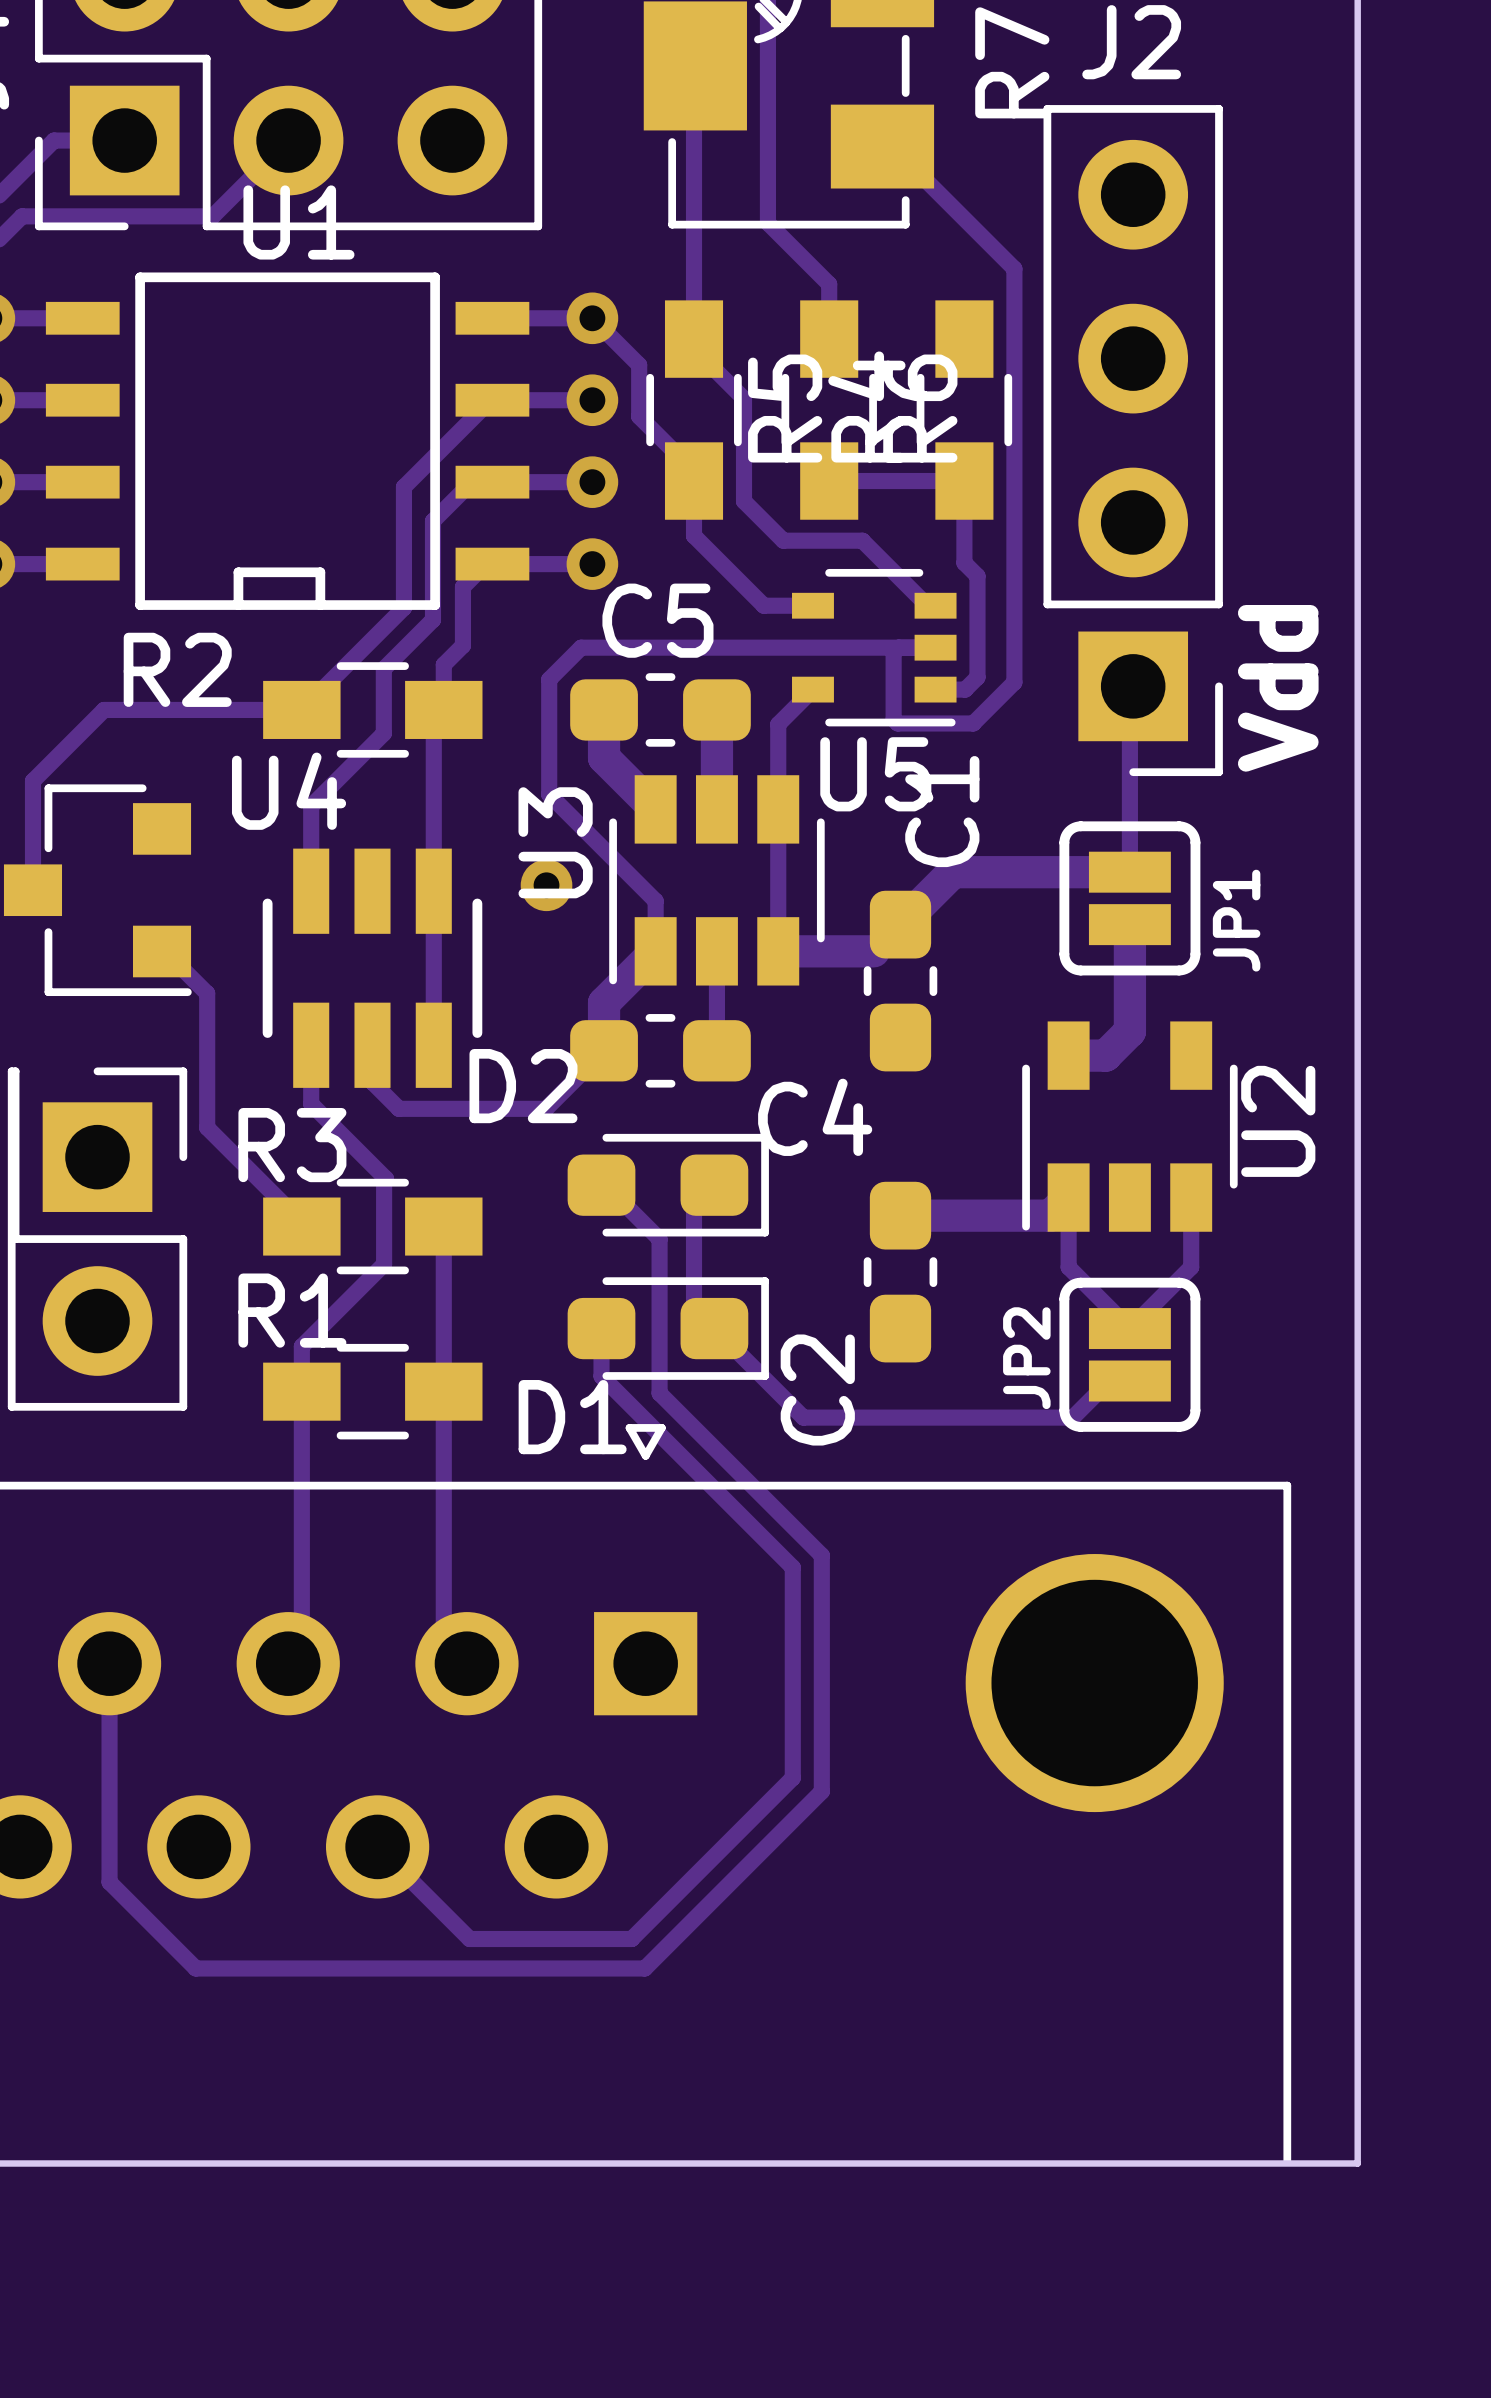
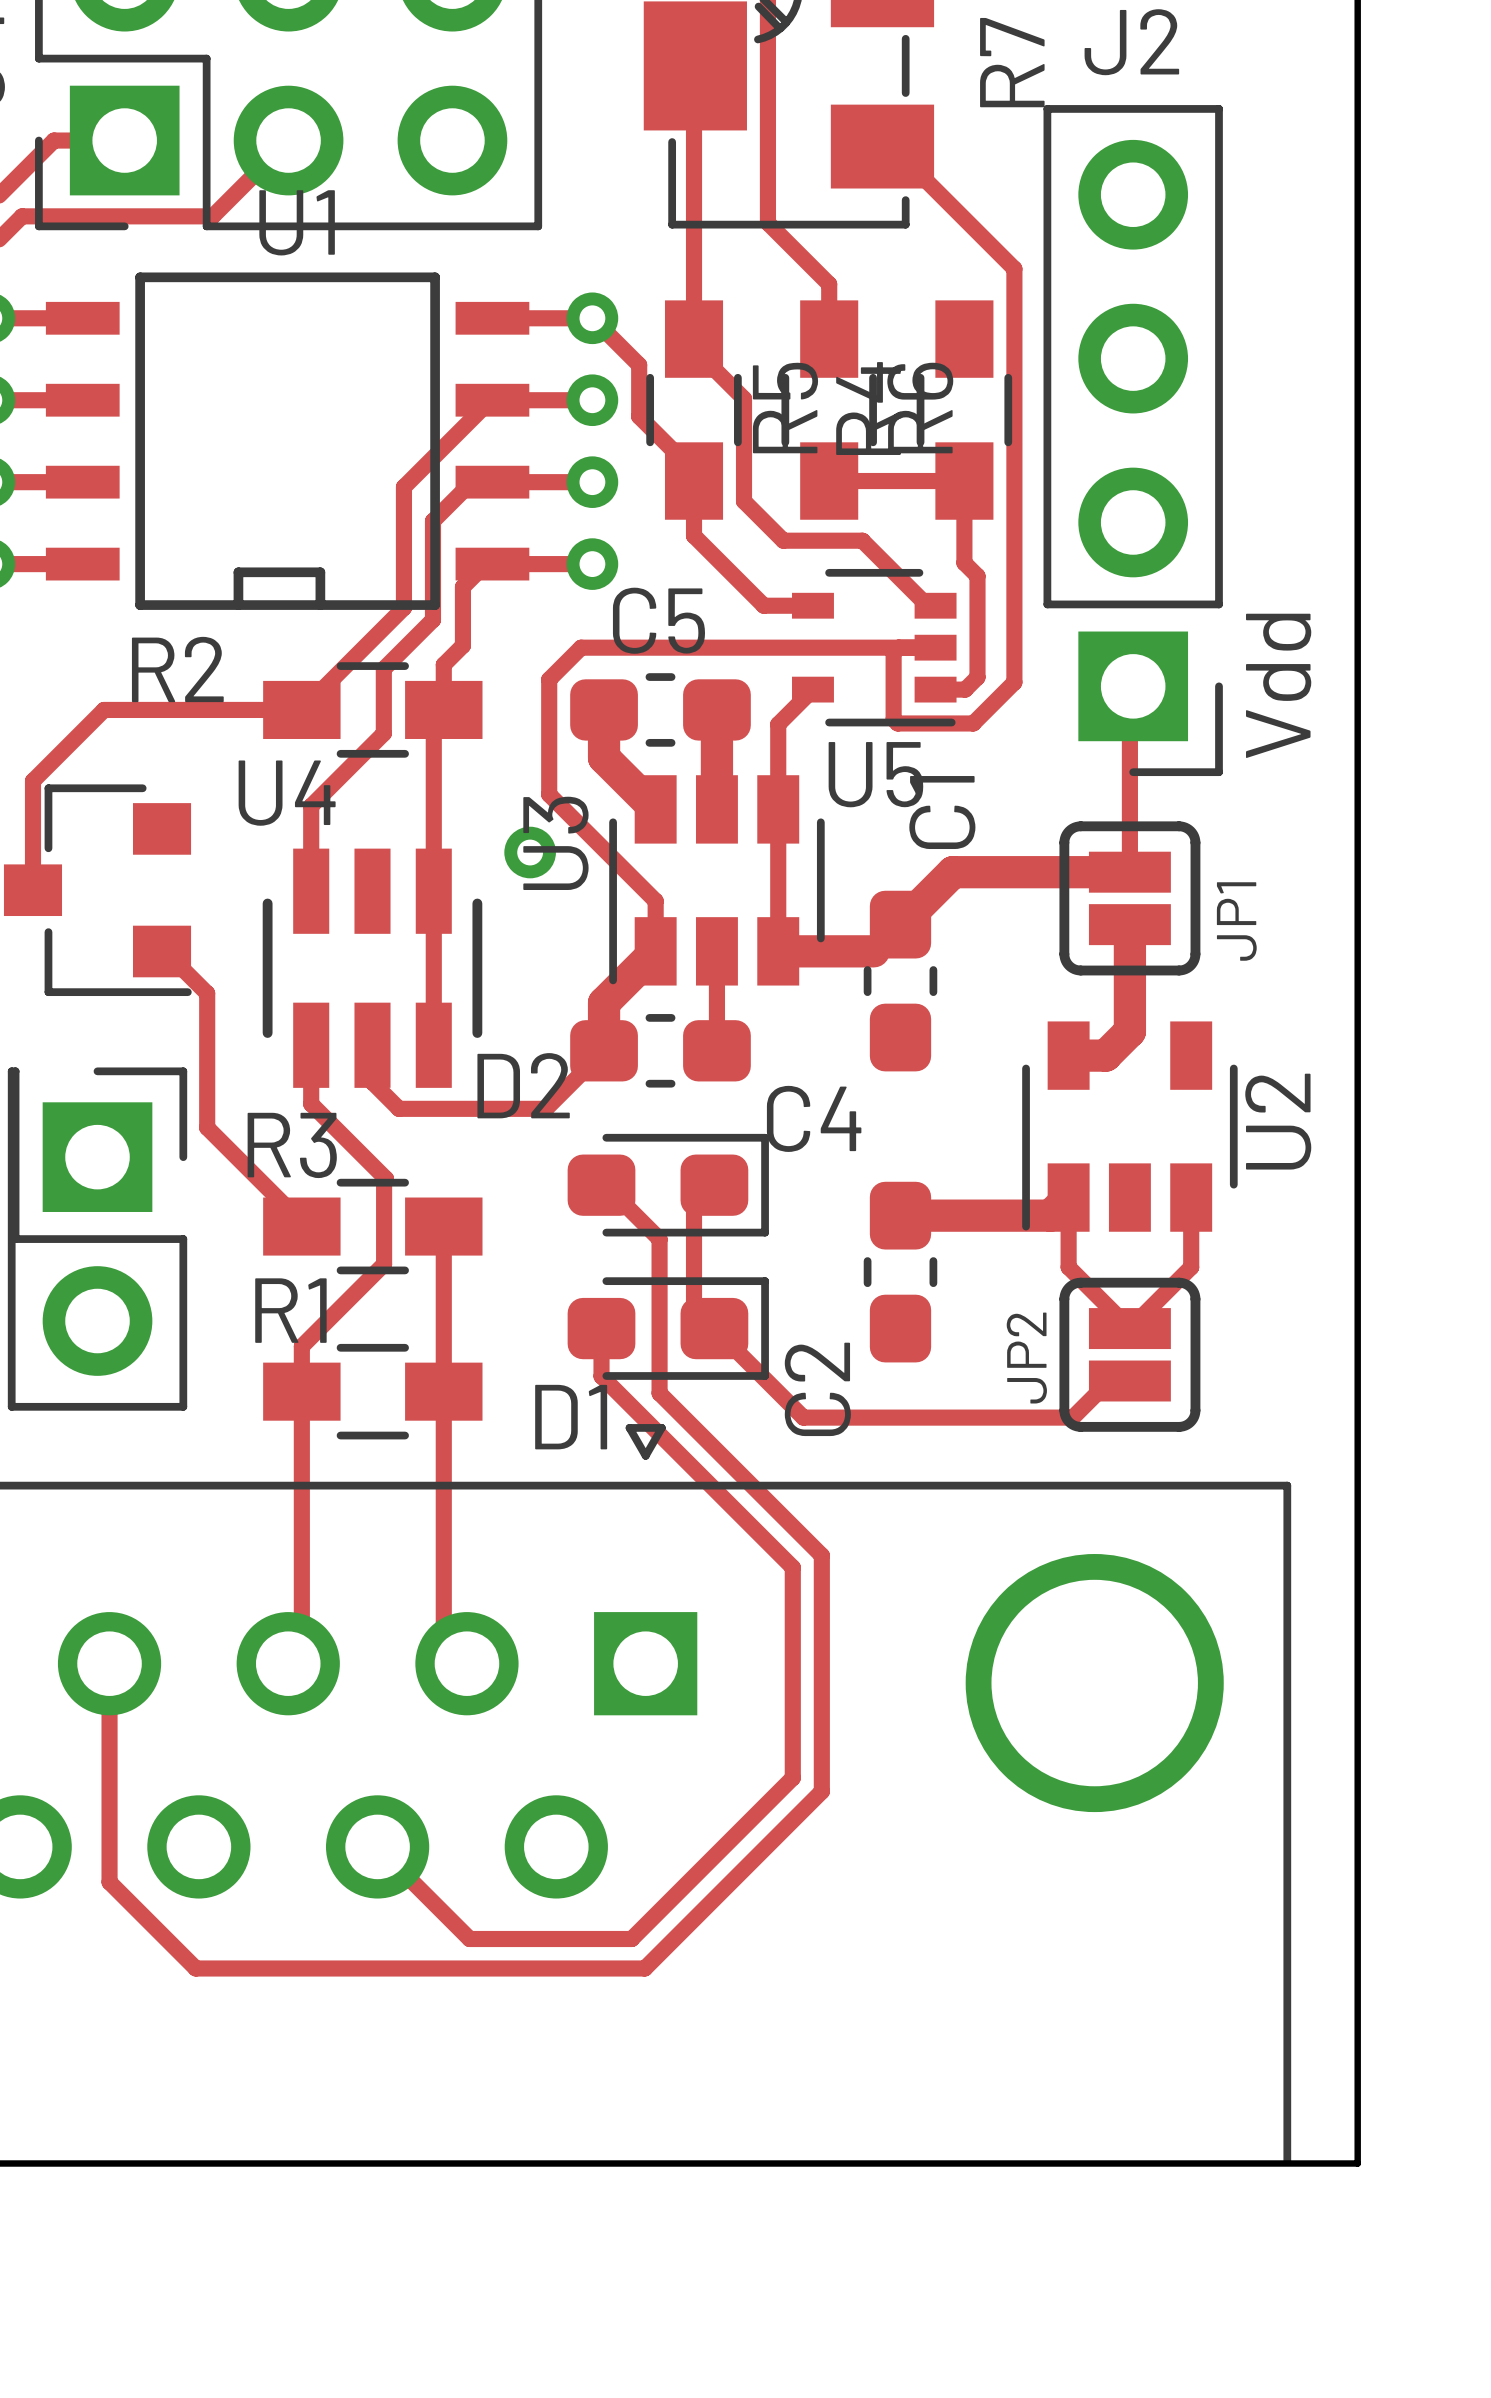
via position: (546, 885) -> (530, 852)

